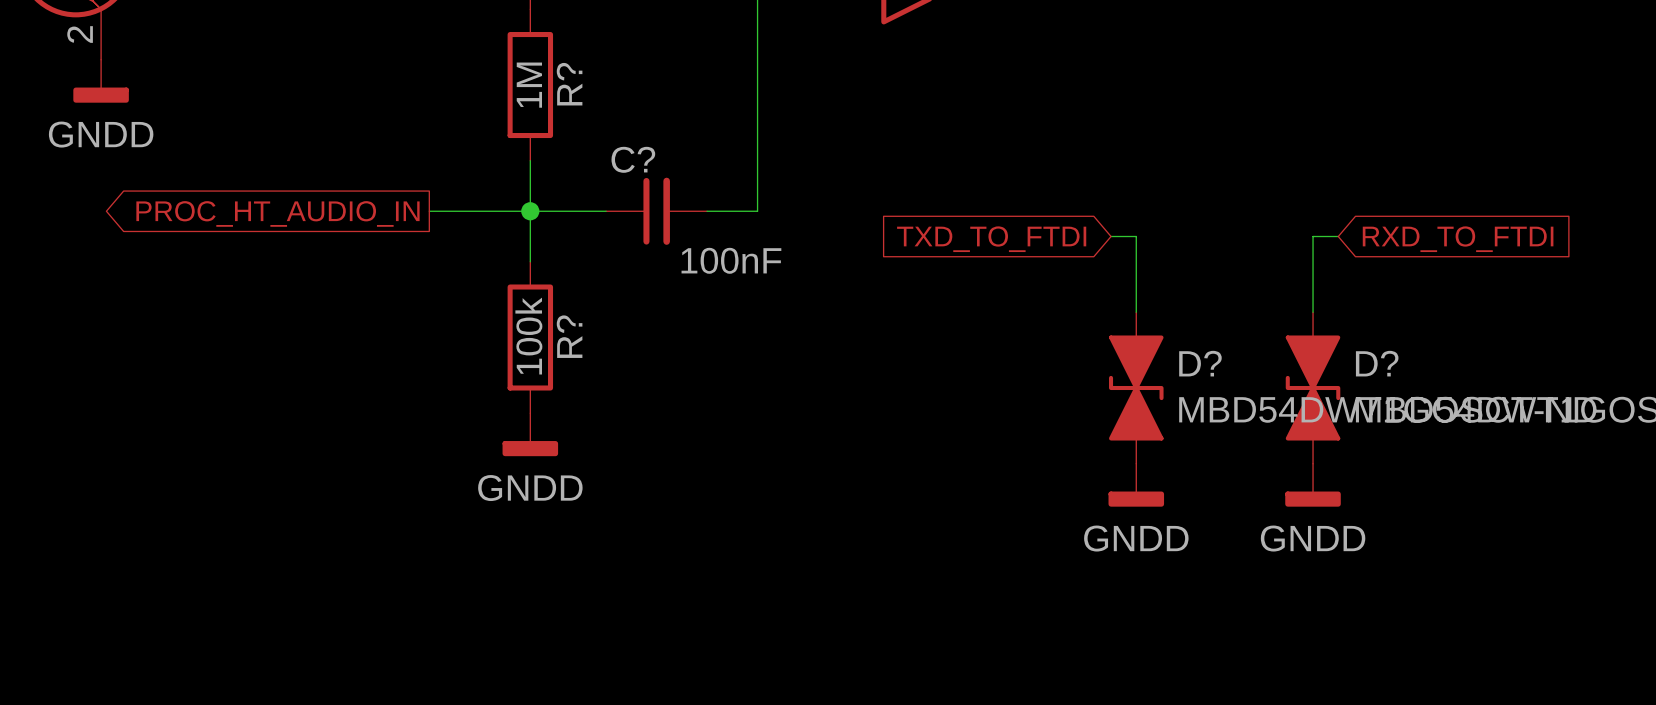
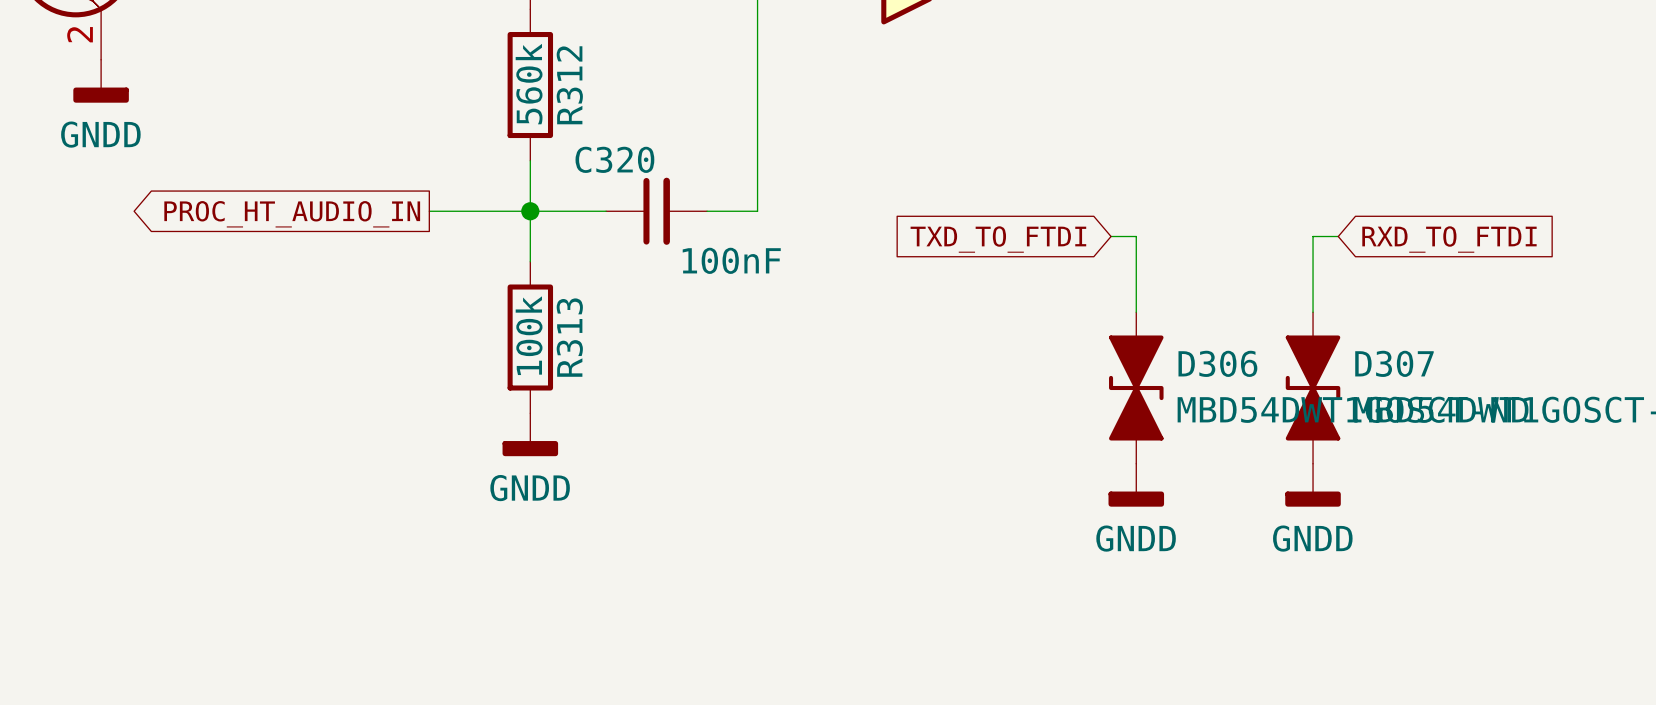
R? name: R? (569, 84) -> R312 (569, 85)
R? value: 1M (529, 85) -> 560k (529, 84)
C? name: C? (633, 159) -> C320 (614, 159)
R? name: R? (569, 336) -> R313 (569, 337)
D? name: D? (1200, 363) -> D306 (1217, 363)
D? name: D? (1377, 363) -> D307 (1394, 363)

